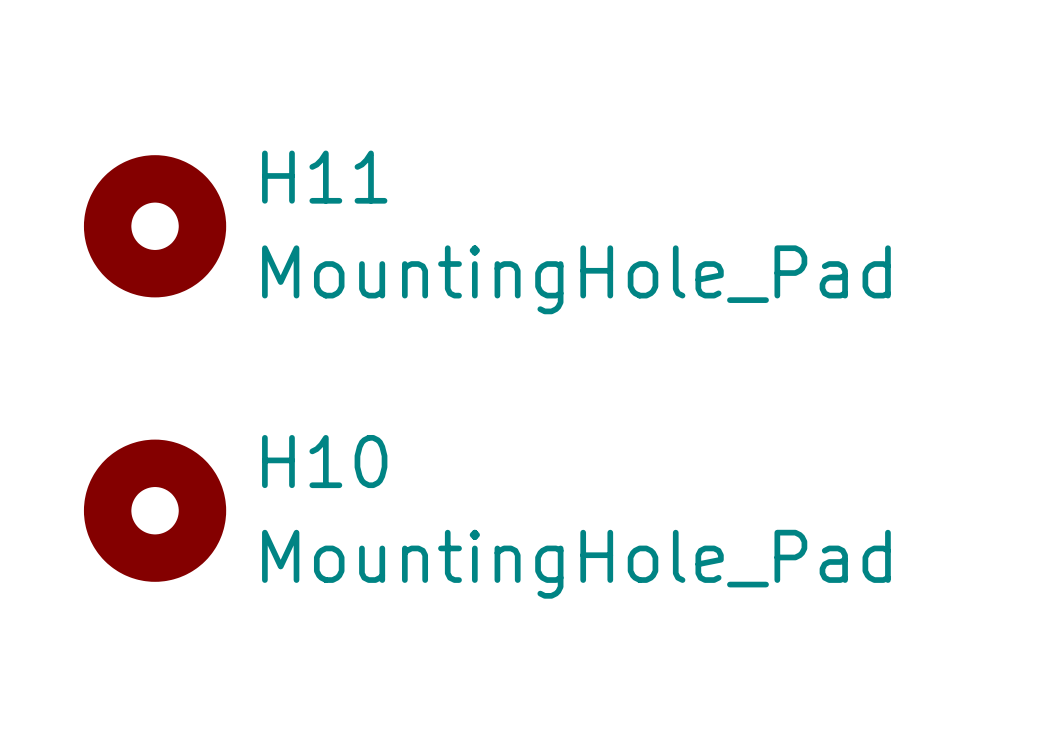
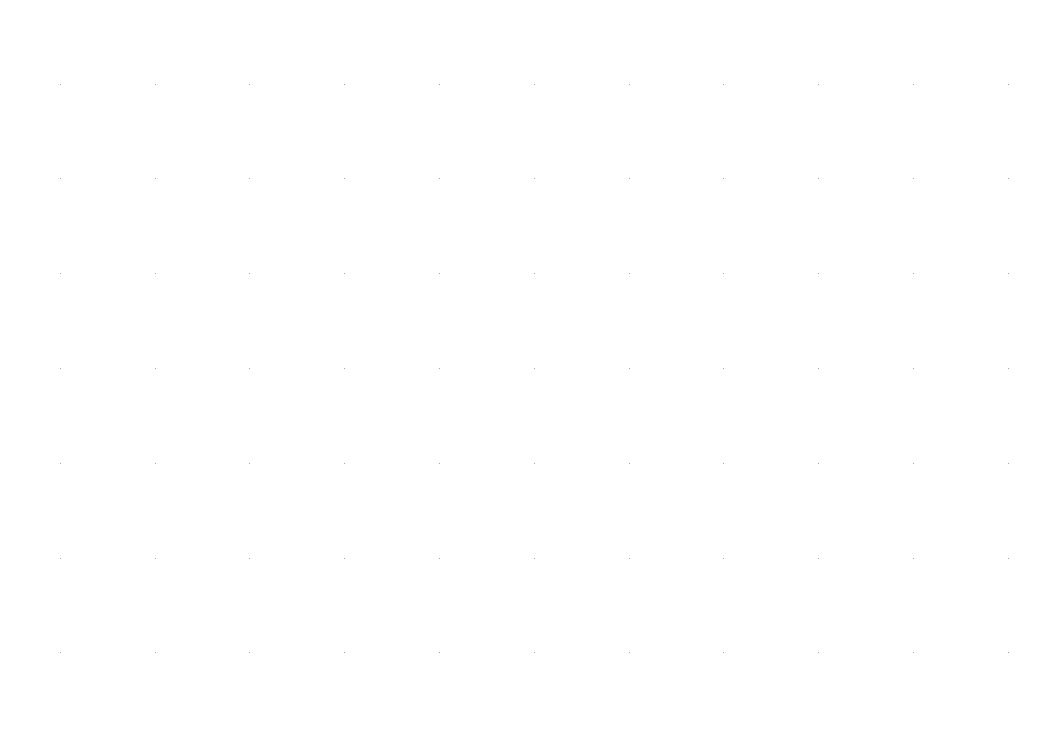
H11: MountingHole_Pad (155, 226) -> none
H10: MountingHole_Pad (155, 510) -> none

